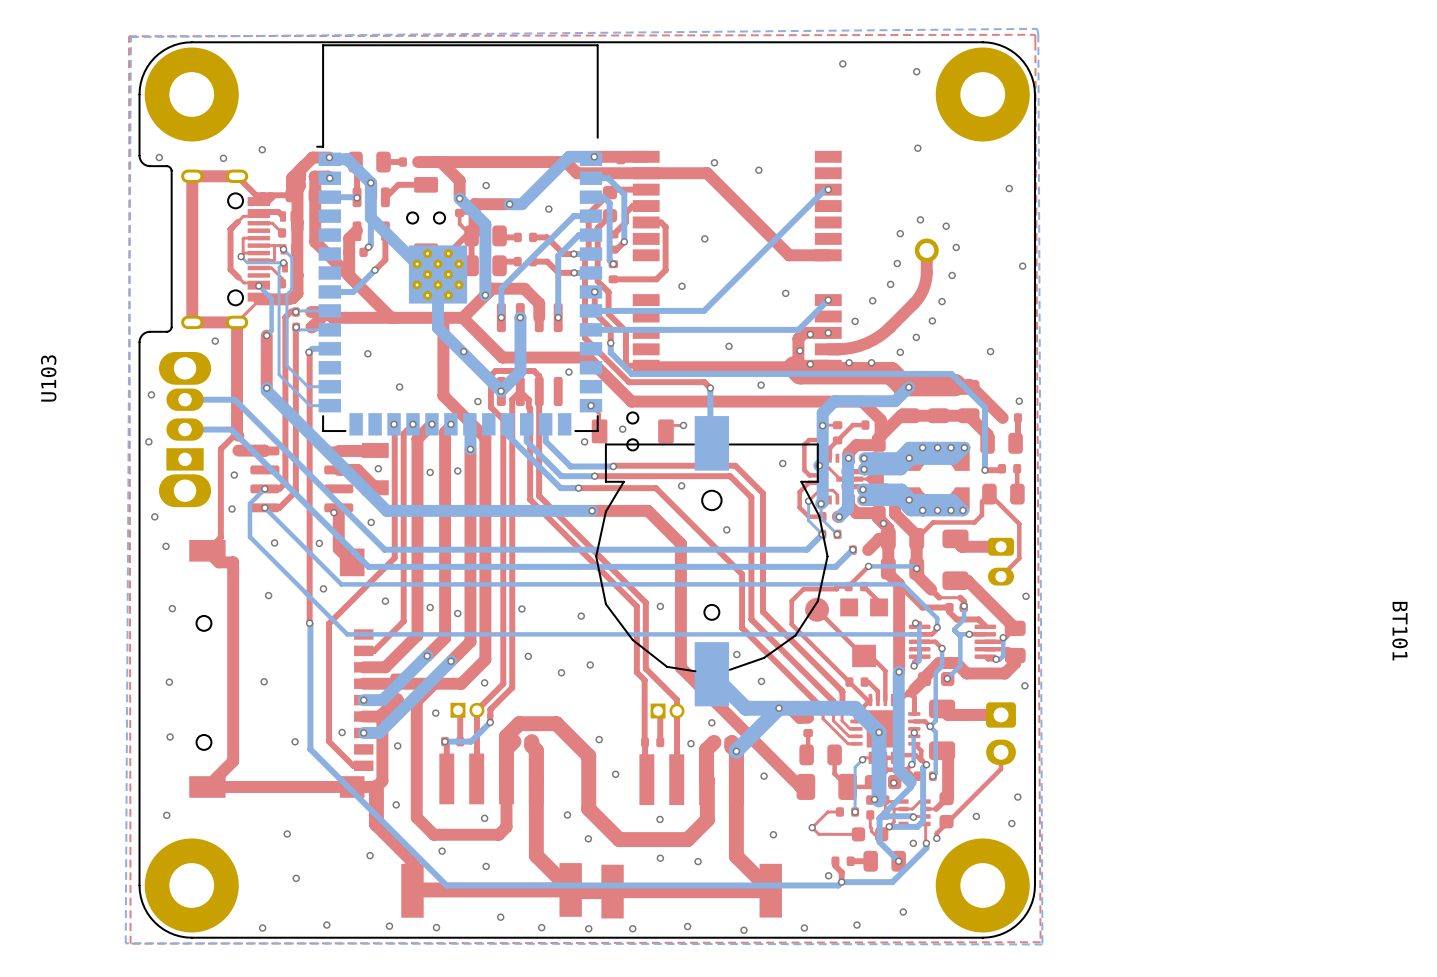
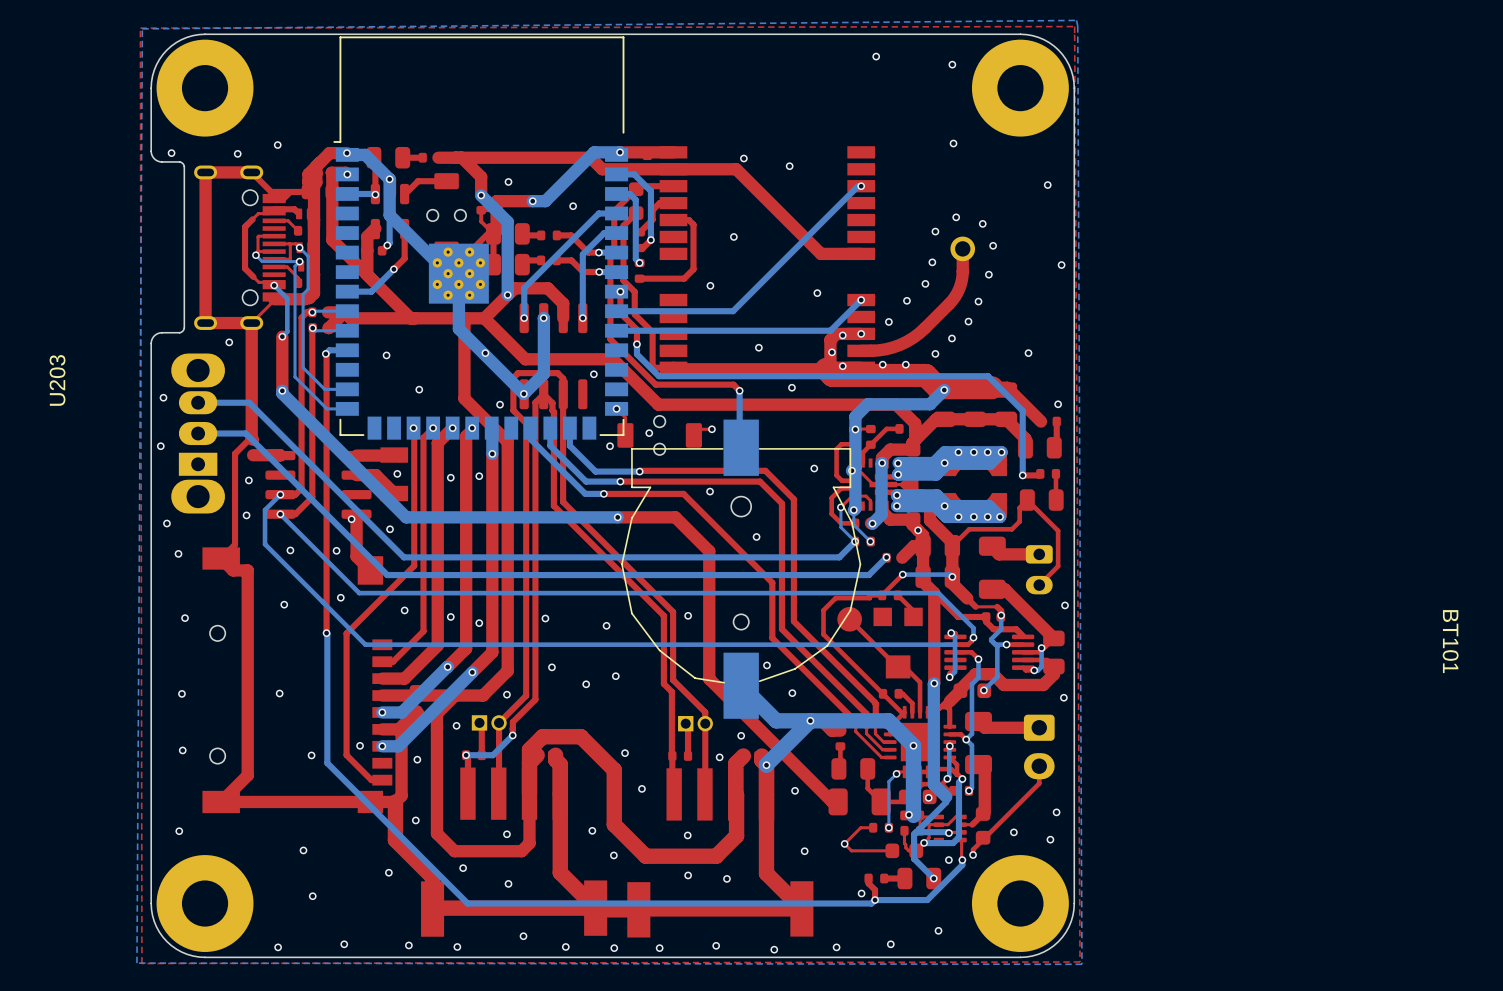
U103 name: U103 (48, 378) -> U203 (57, 380)

